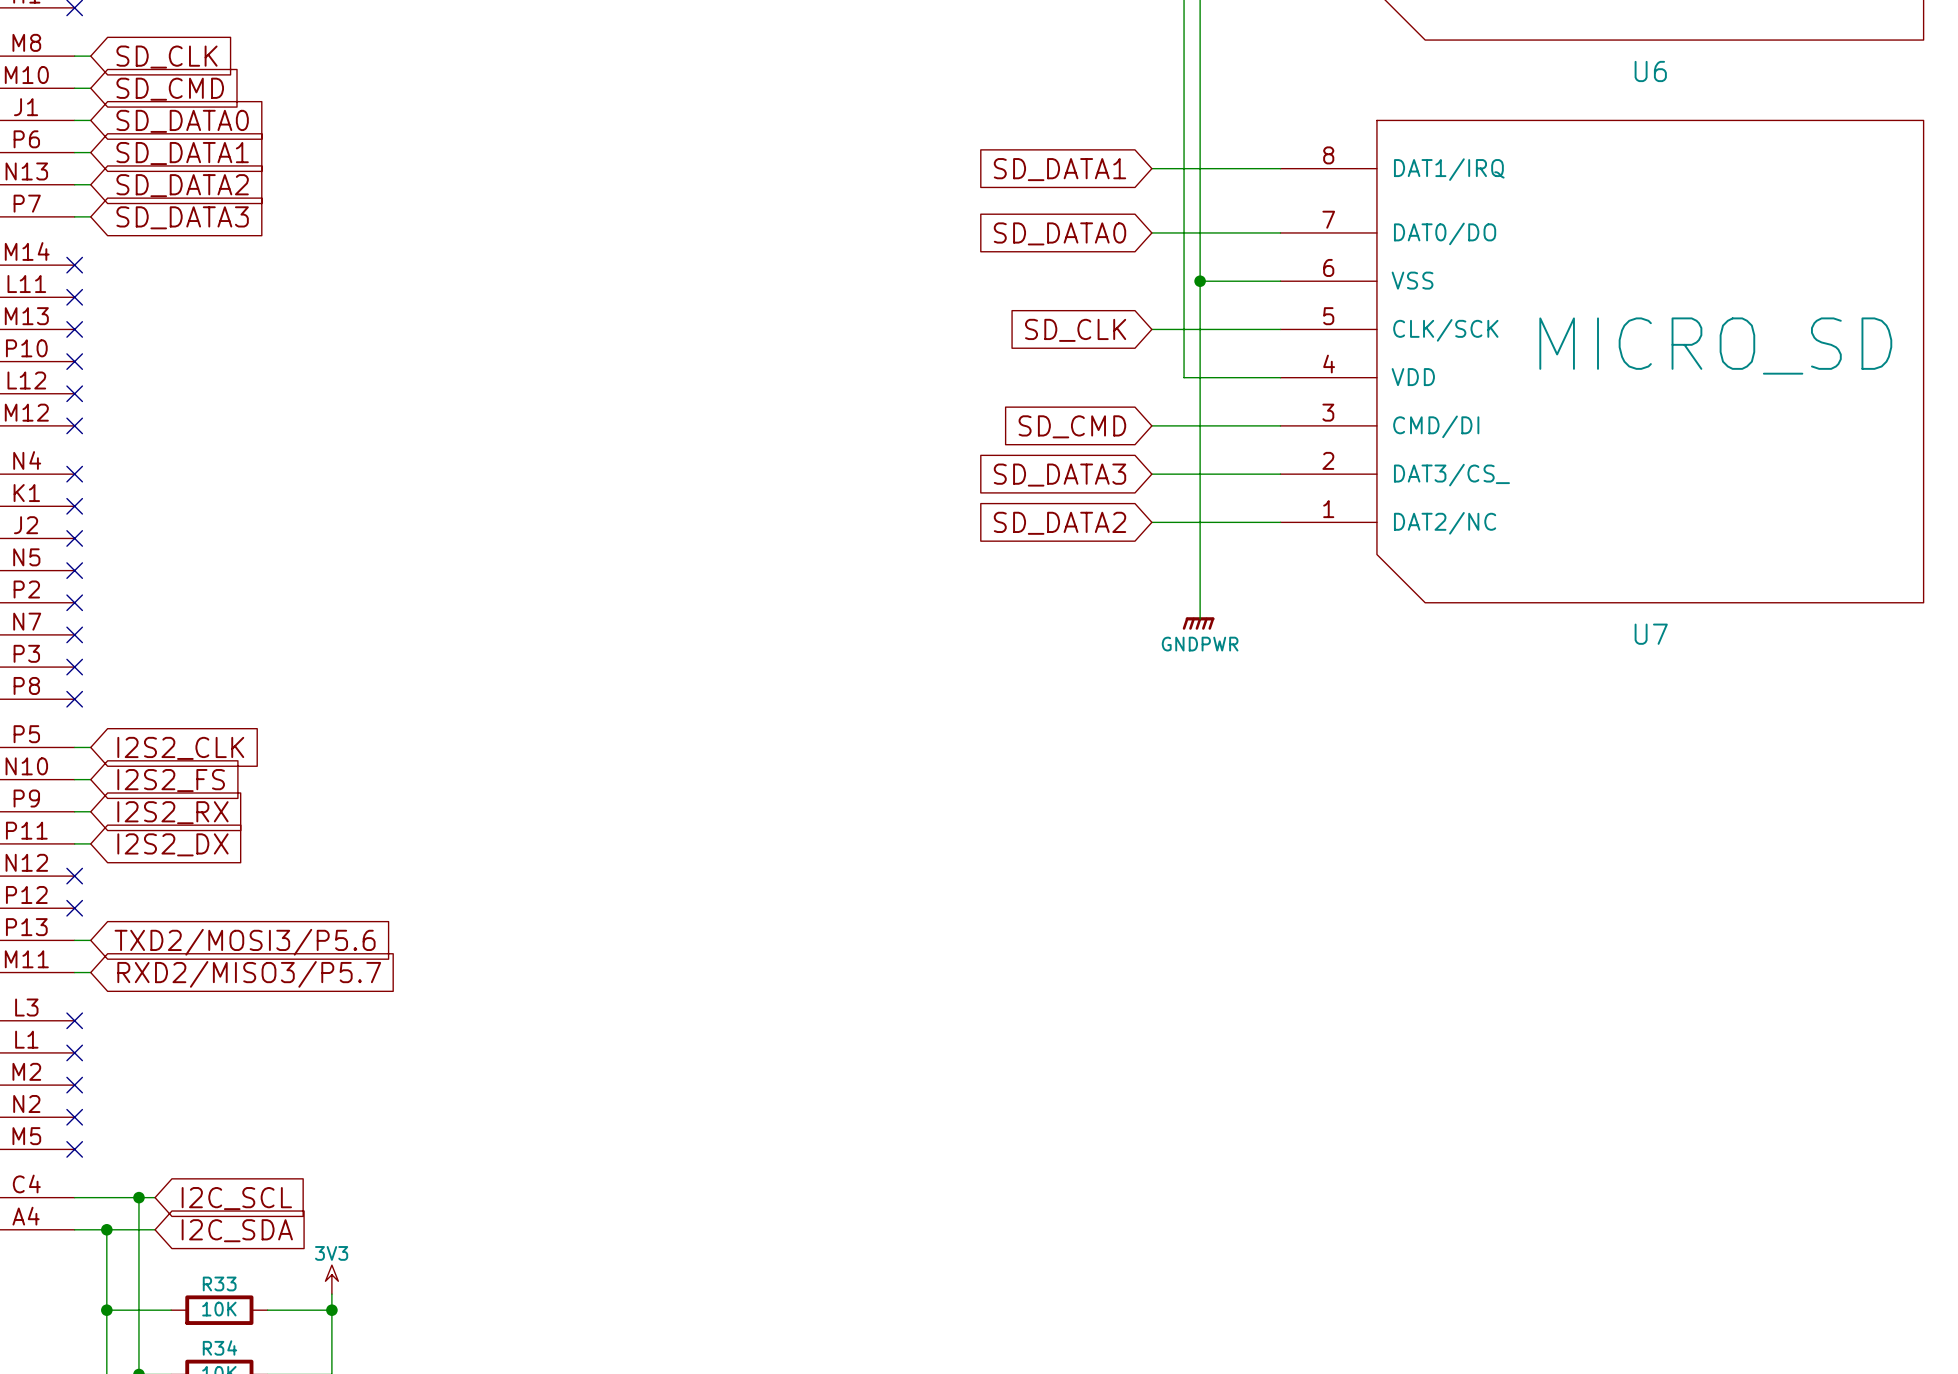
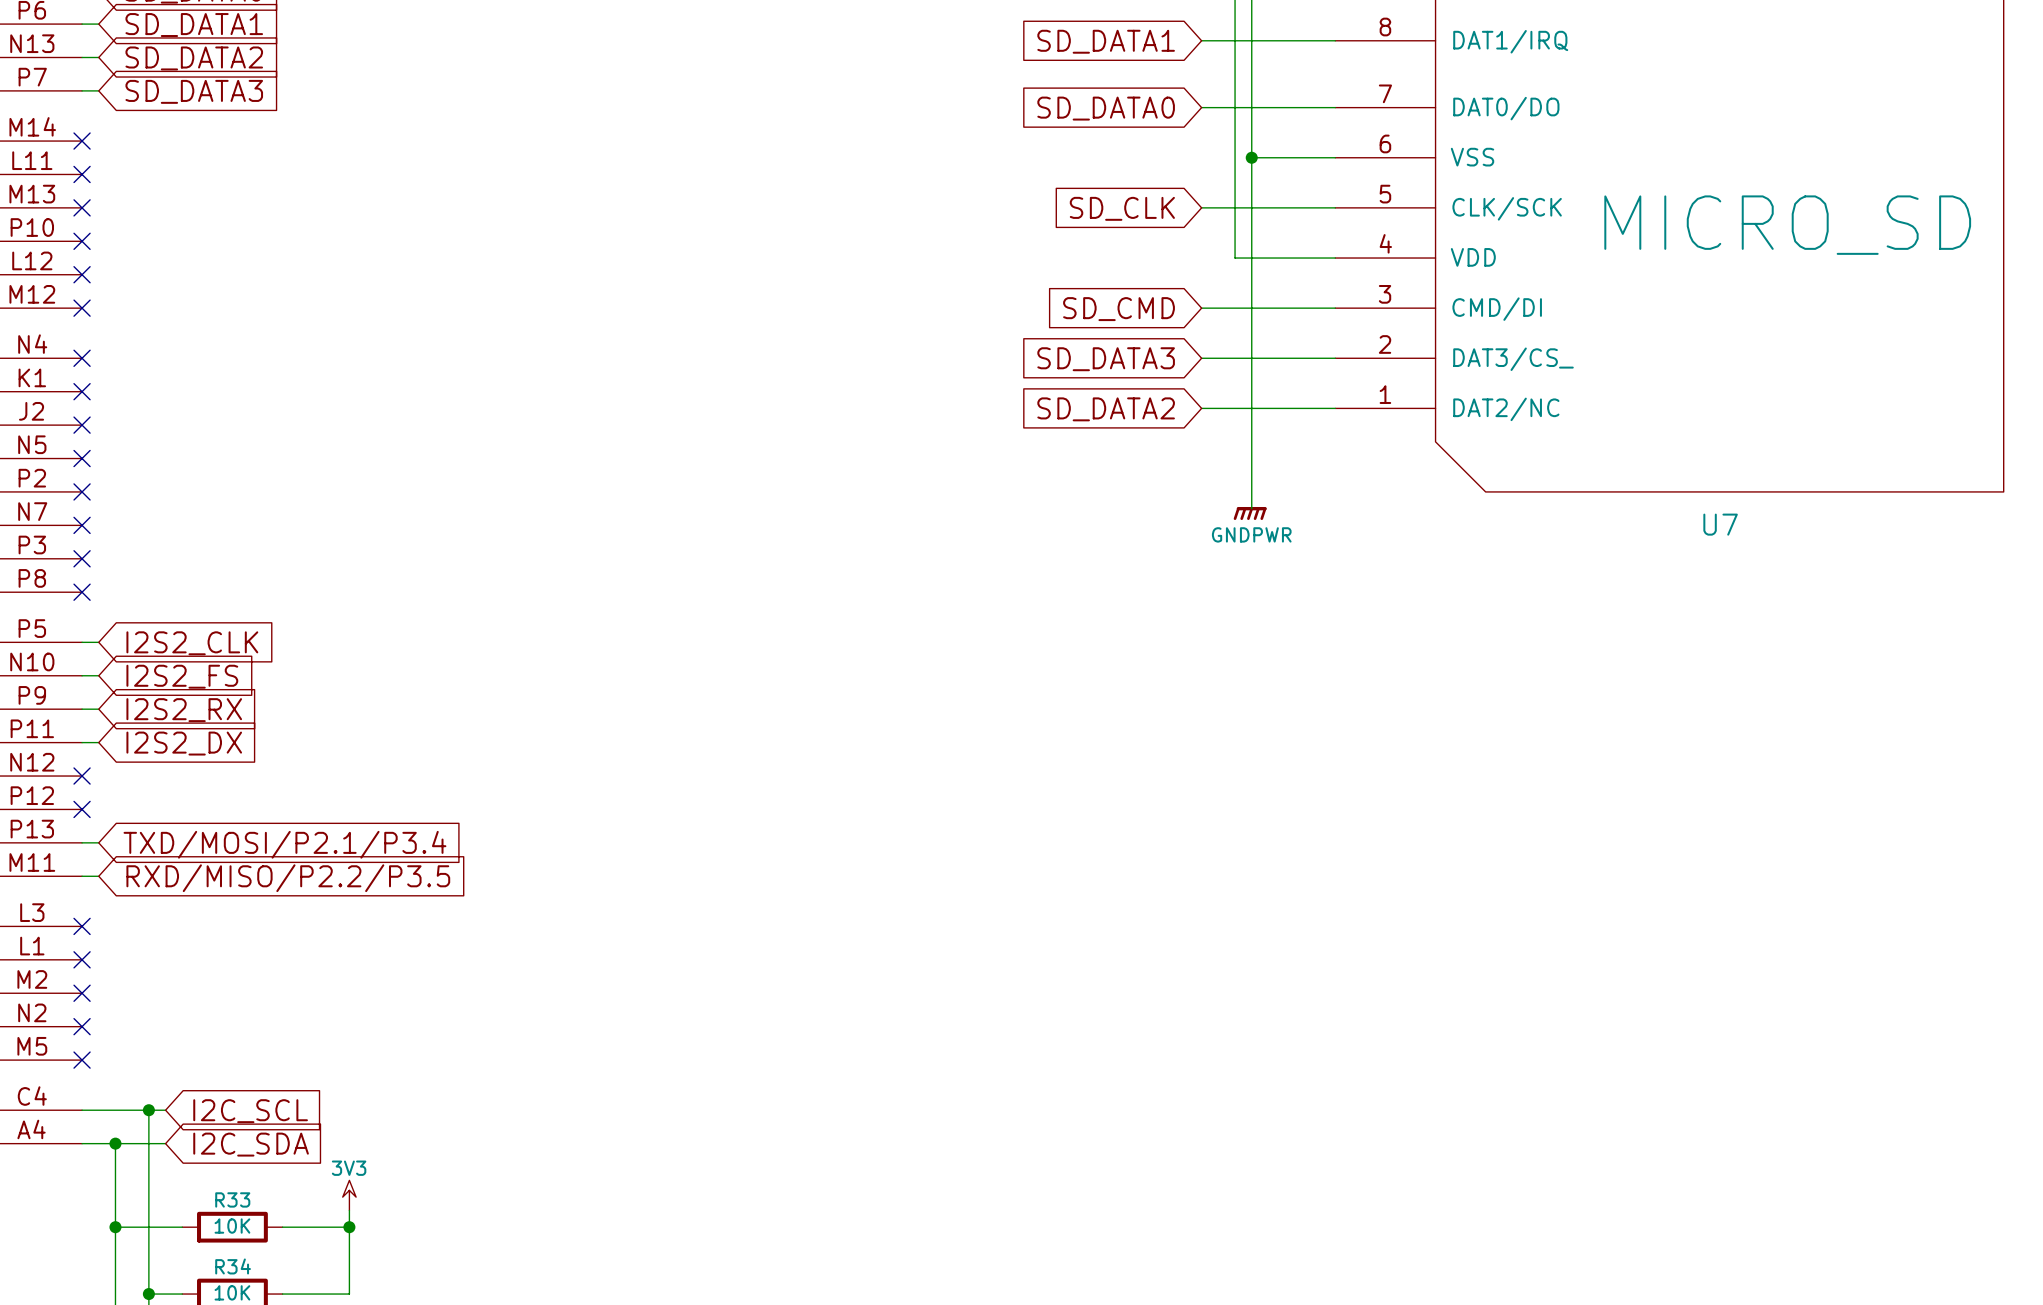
global label: TXD2/MOSI3/P5.6 (245, 942) -> TXD/MOSI/P2.1/P3.4 (284, 844)
global label: RXD2/MISO3/P5.7 (249, 974) -> RXD/MISO/P2.2/P3.5 (288, 878)

